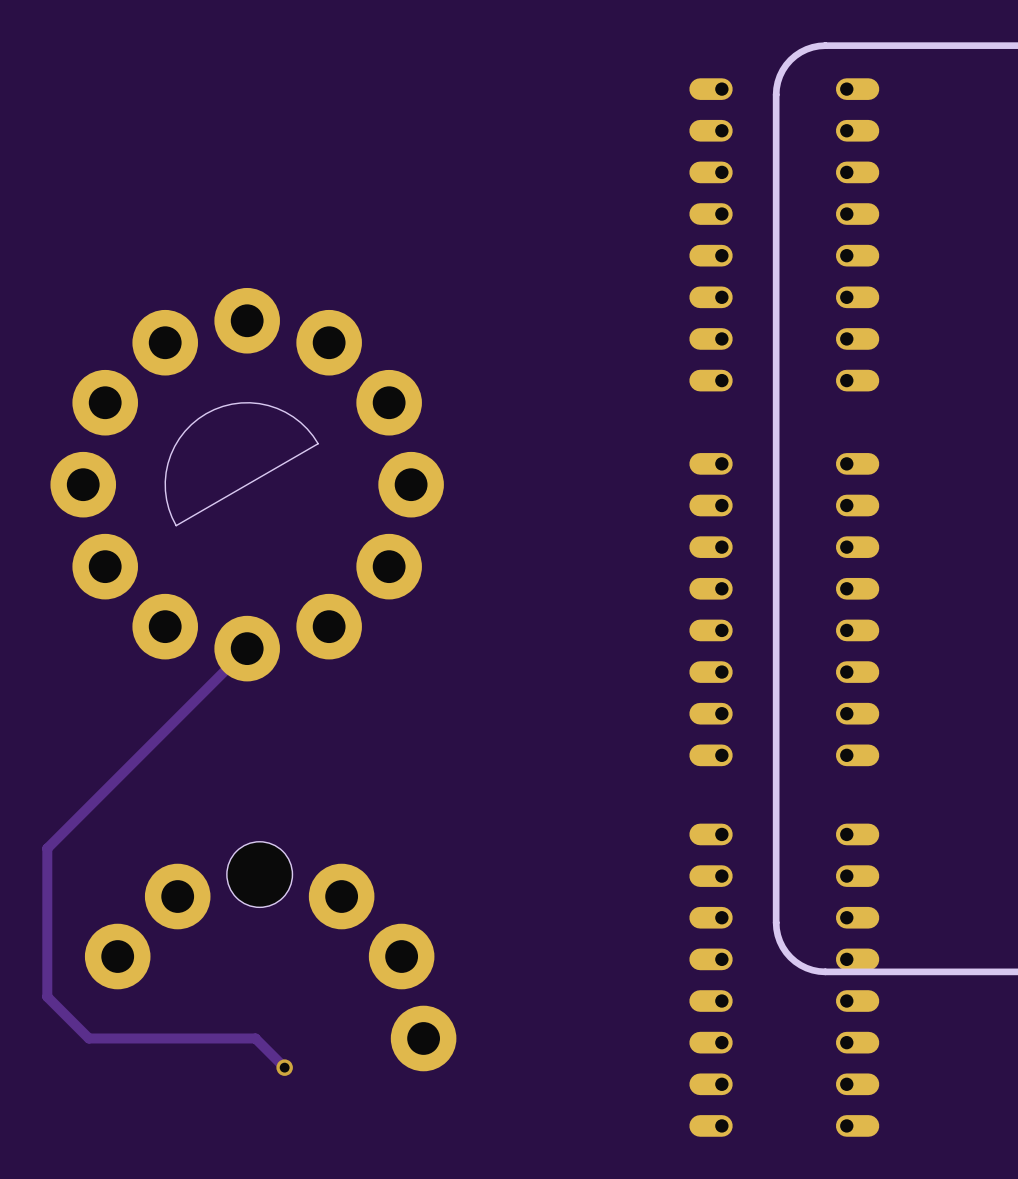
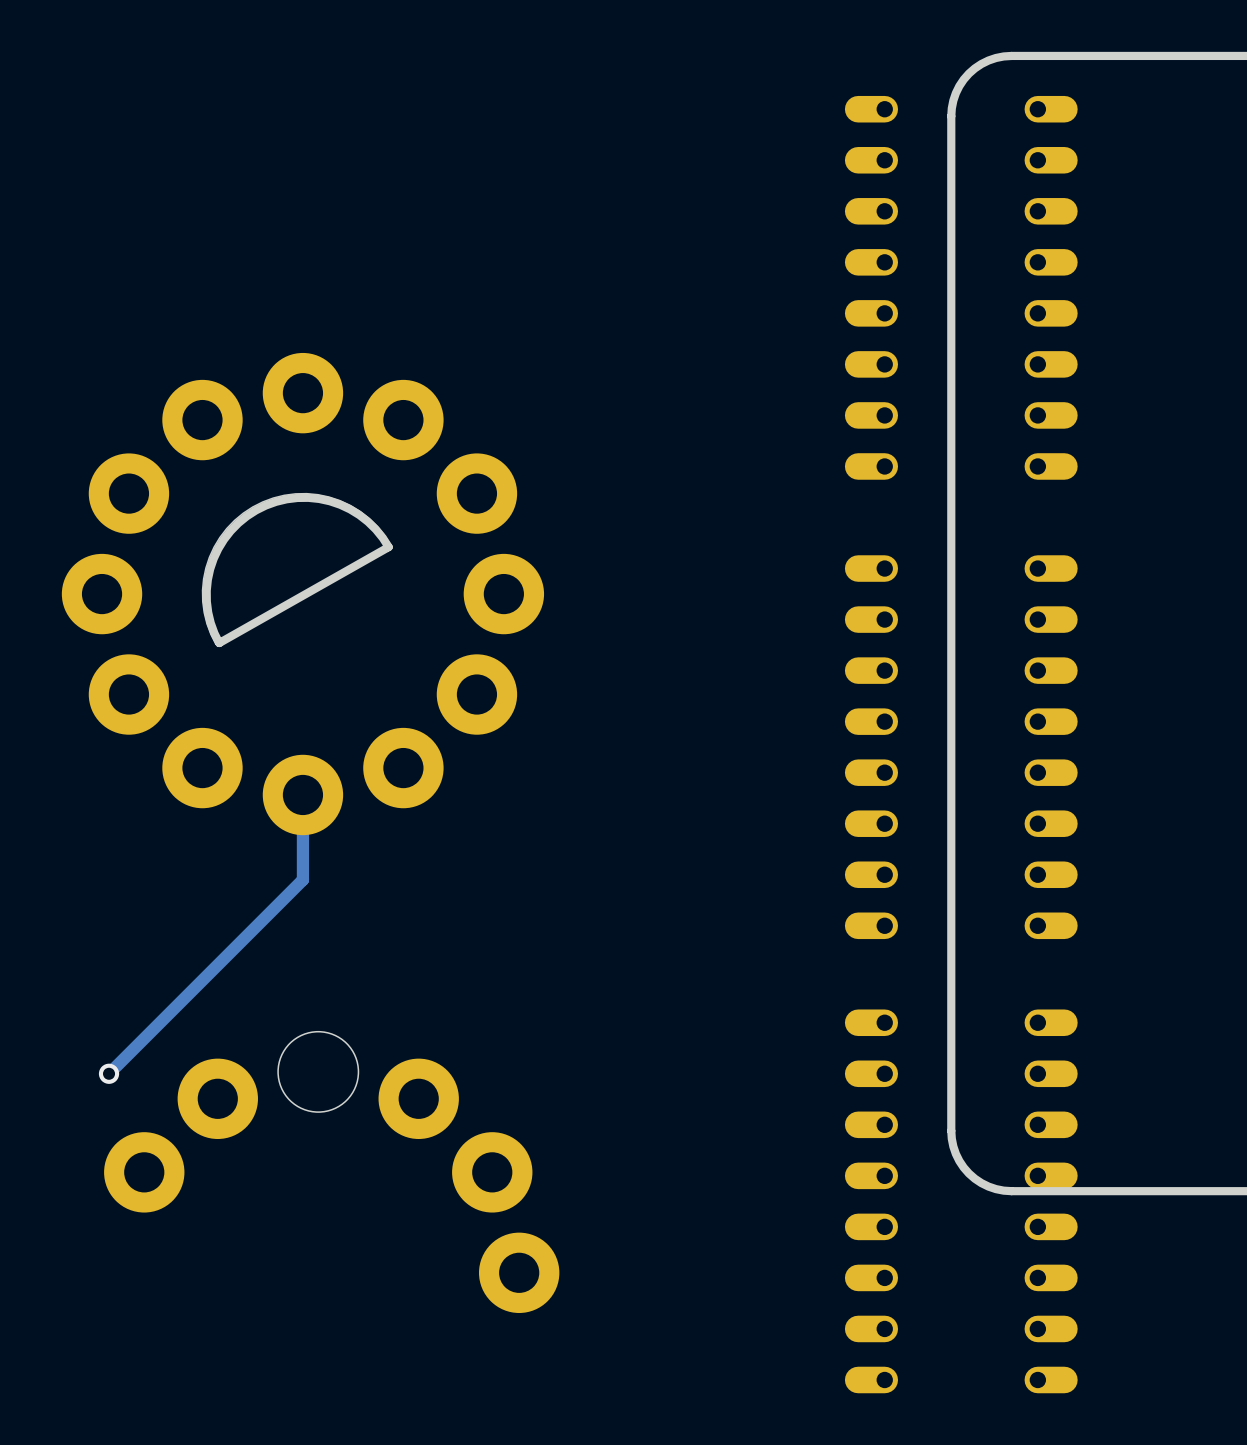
board edge: none -> (388, 547) (219, 643) (208, 612) (206, 590) (210, 569) (223, 539) (238, 523) (256, 510) (286, 499) (308, 497) (329, 501) (359, 515) (375, 529) (388, 547)
track: (247, 648) (47, 848) (47, 996) (88, 1038) (255, 1038) (284, 1067) -> (302, 794) (302, 879) (109, 1073)
via: none -> (109, 1073)
via: (284, 1067) -> none

